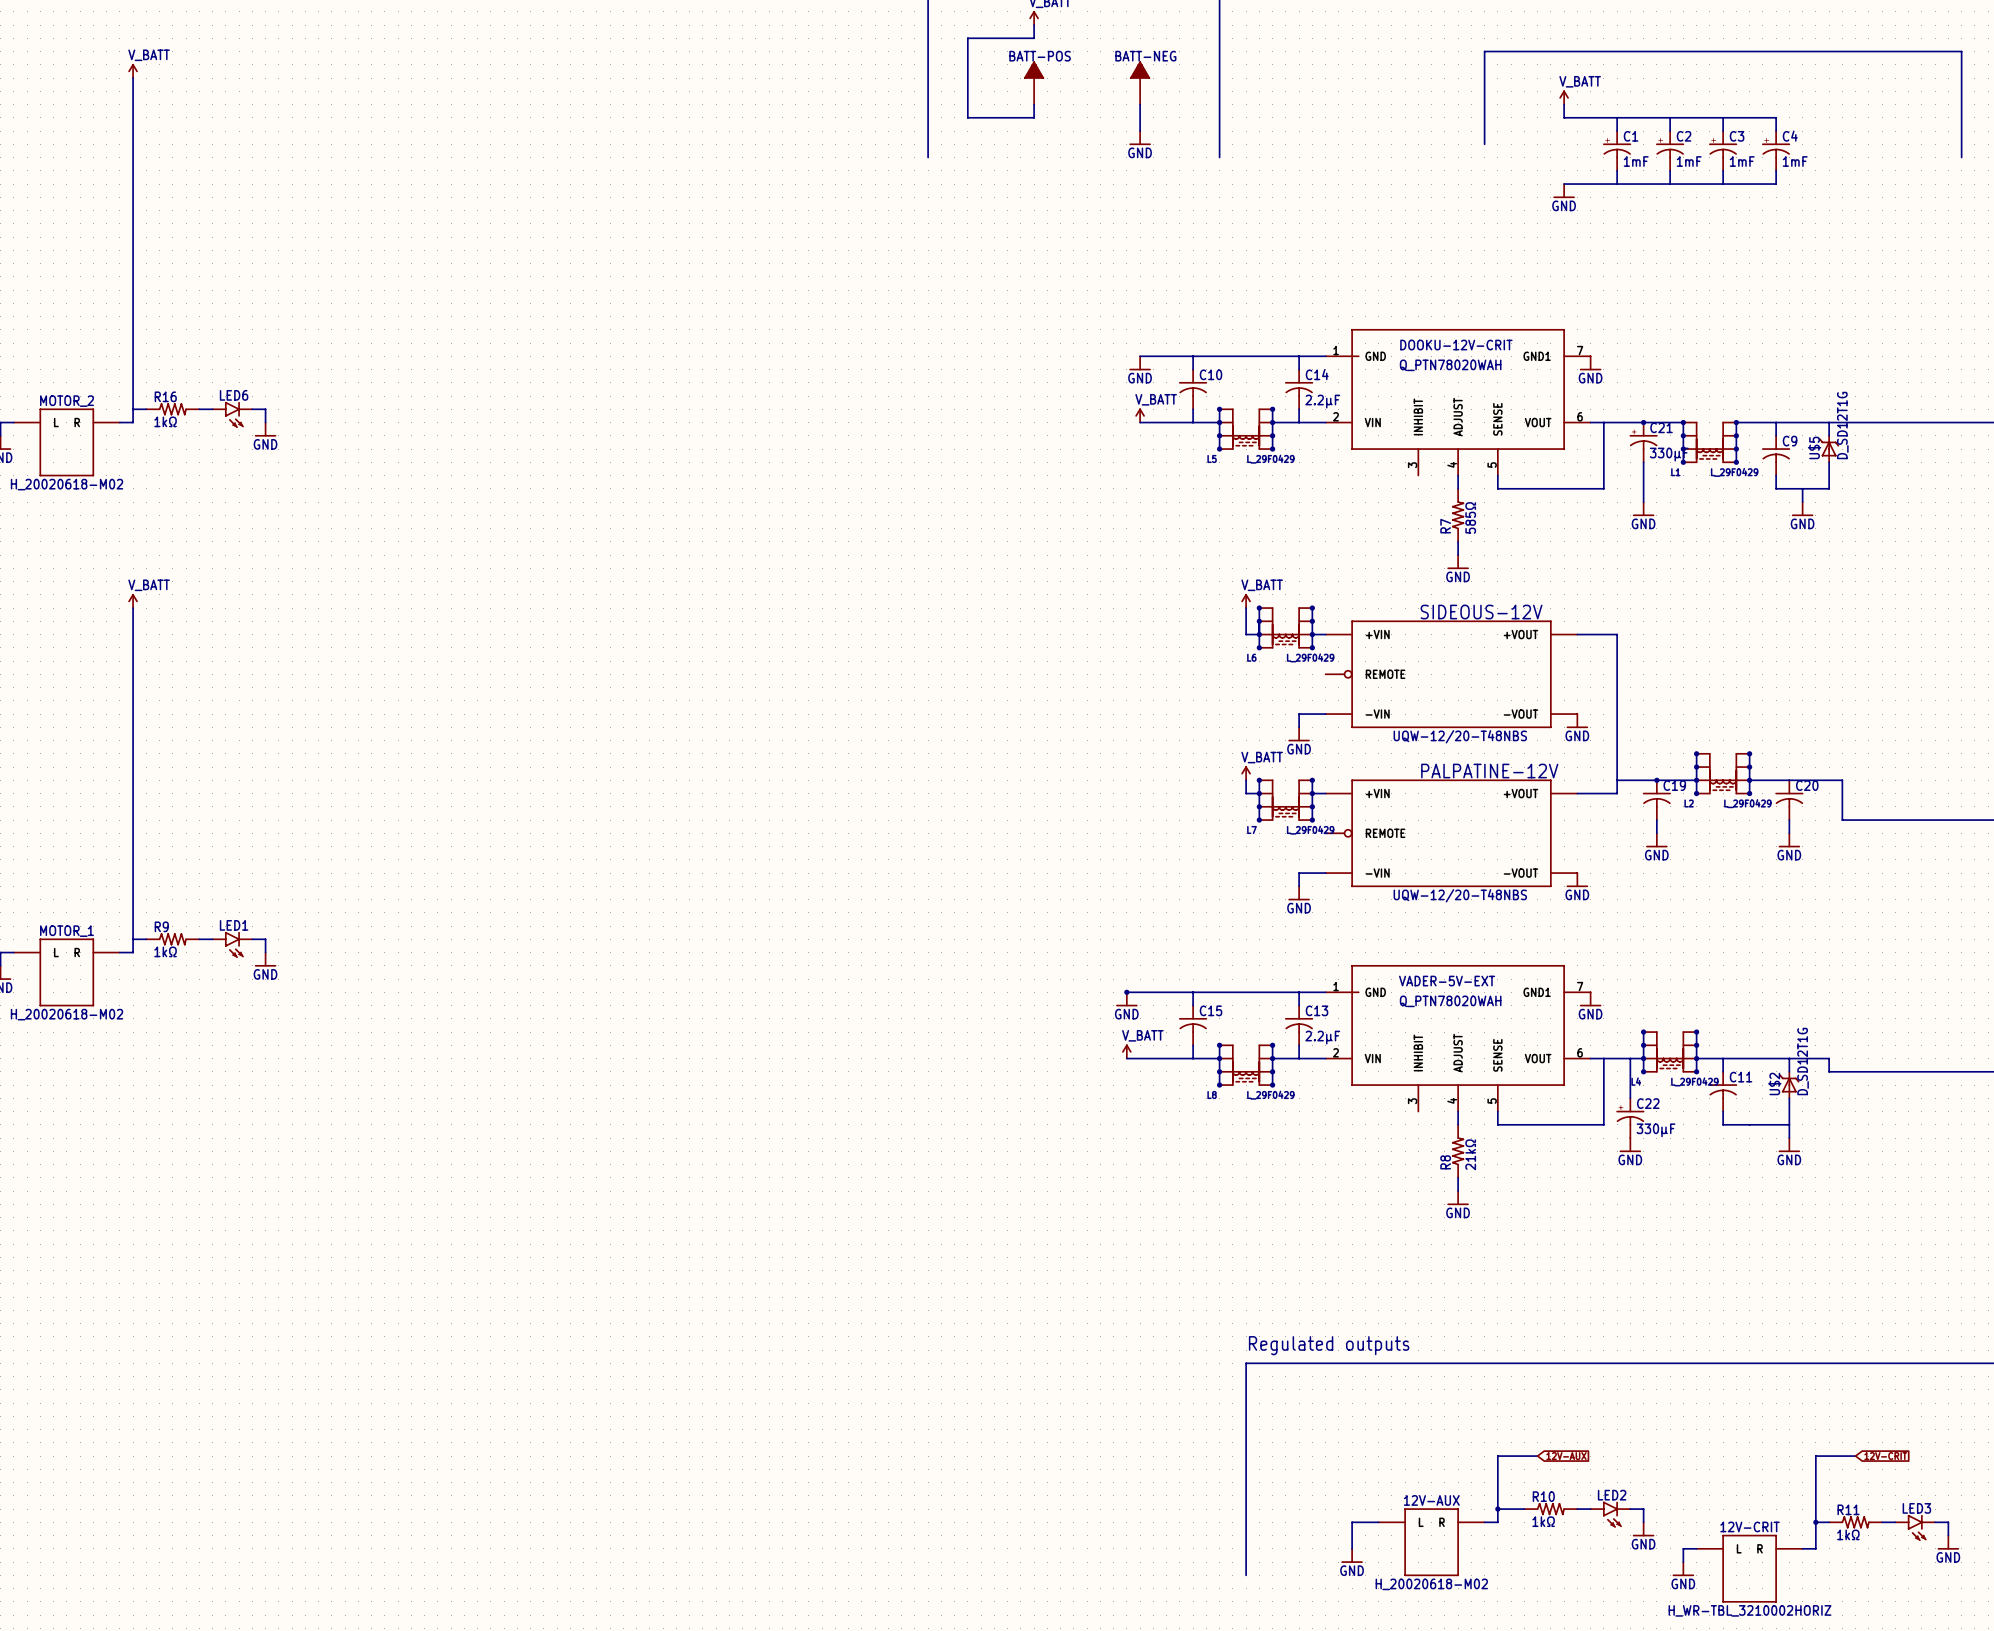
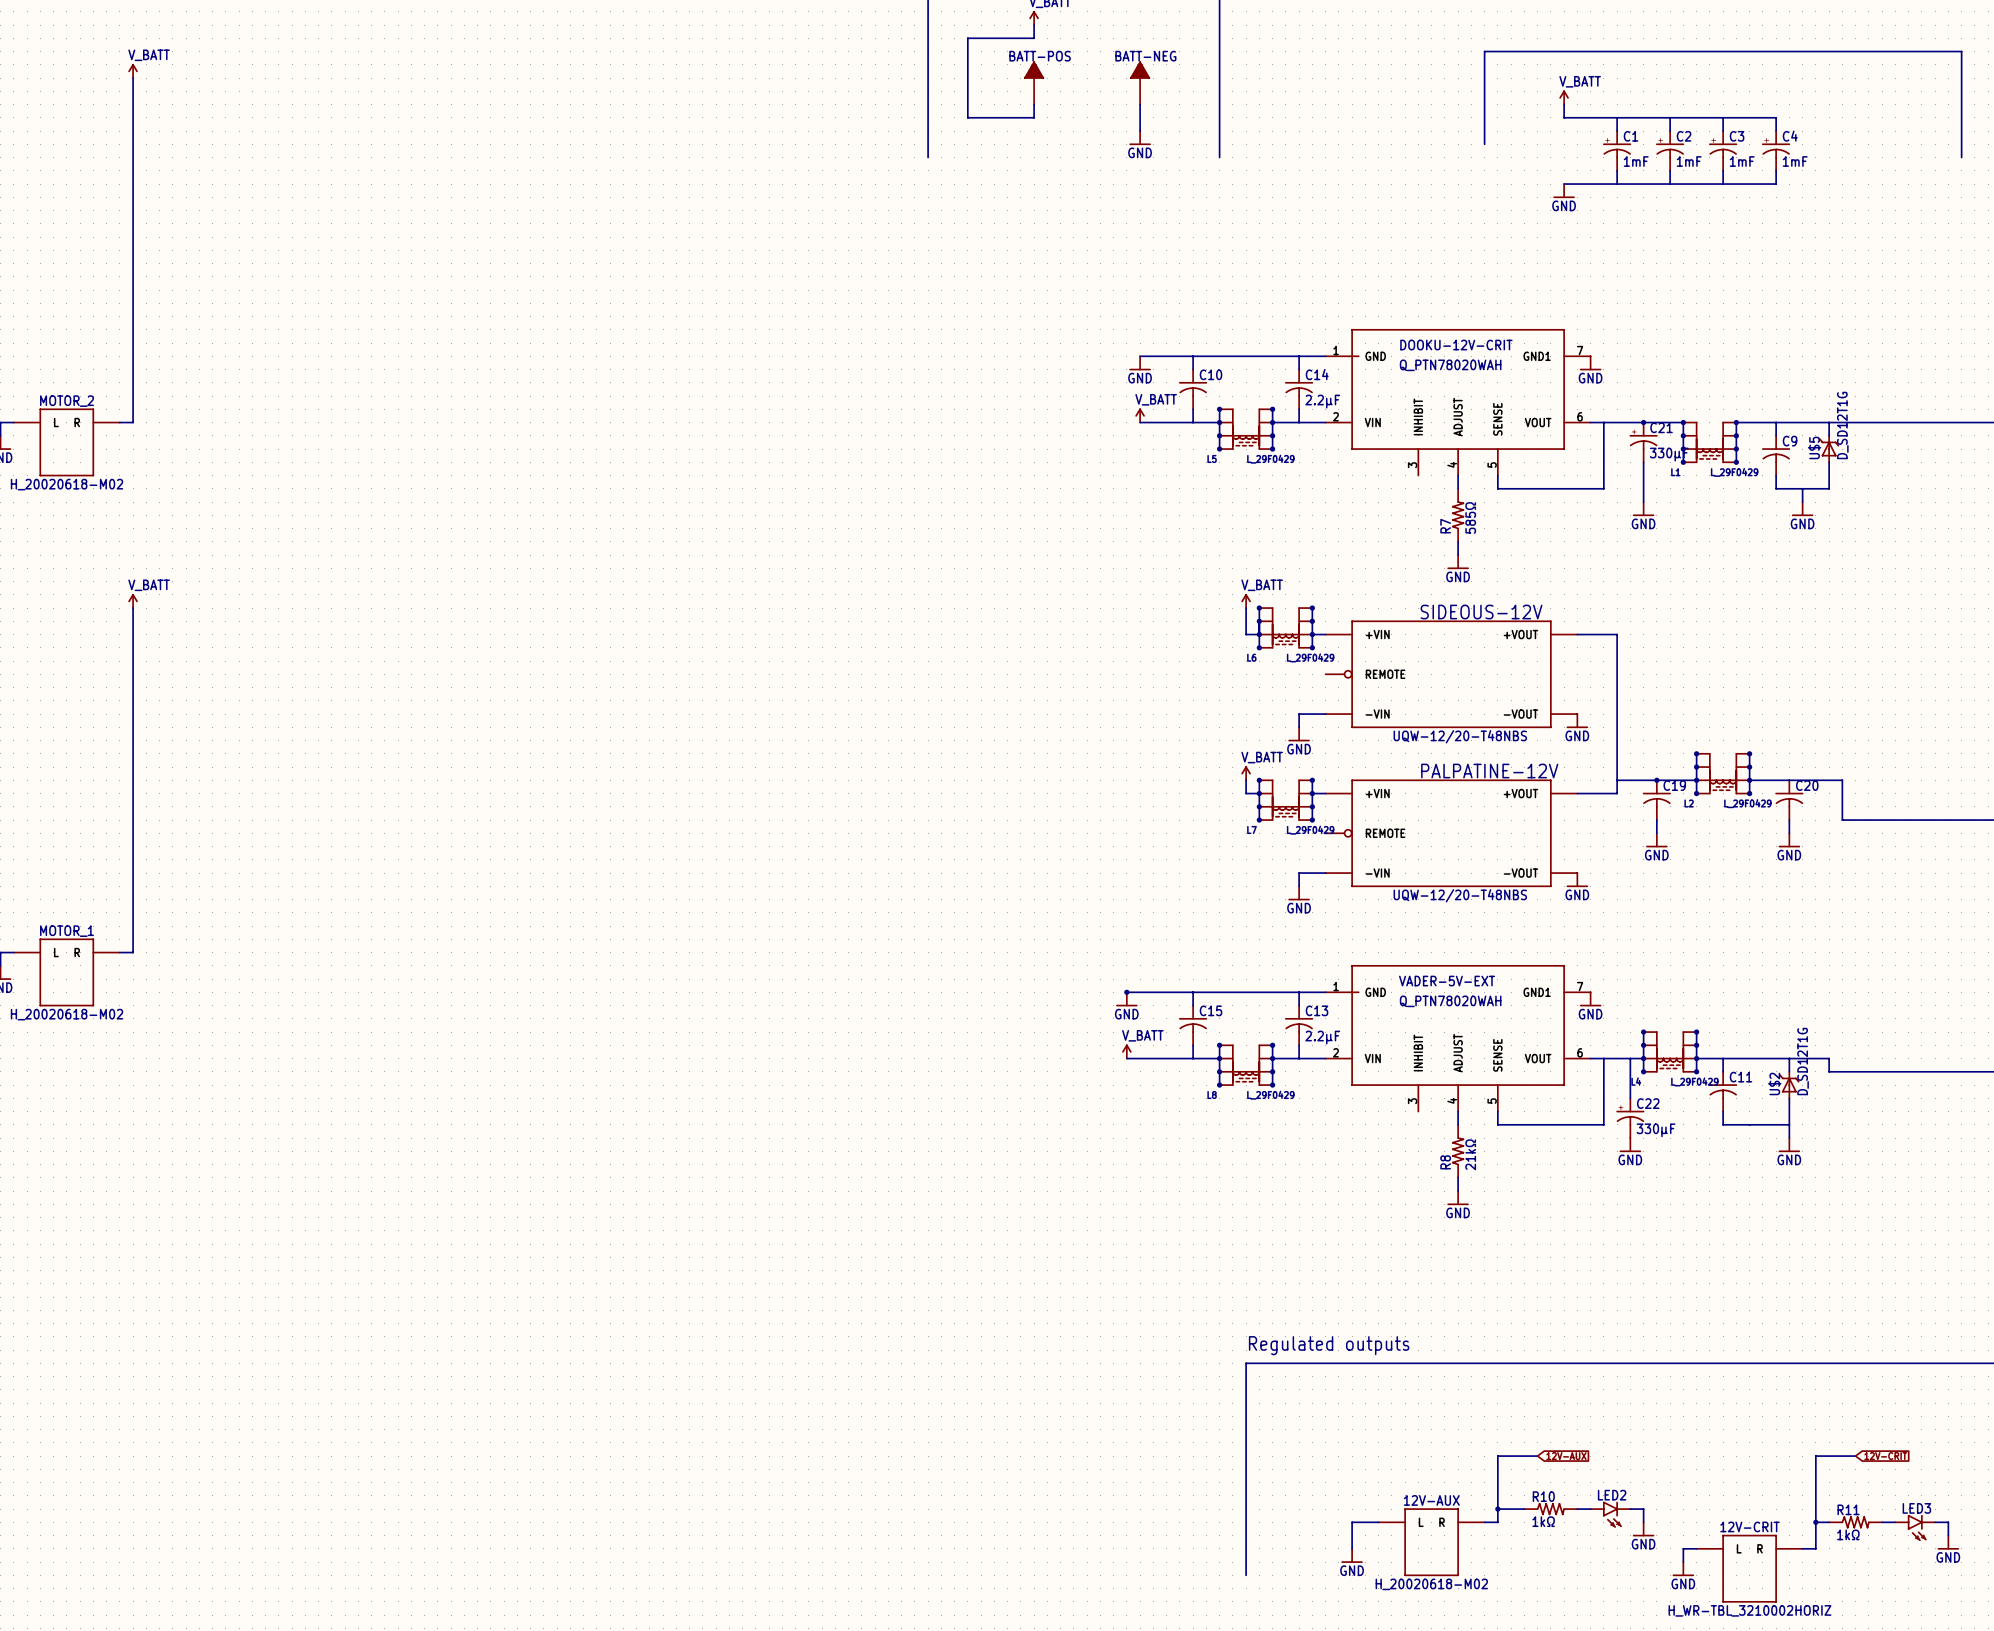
wire: (133, 409) (146, 409) -> none
R16: 1kΩ (172, 409) -> none
wire: (199, 409) (212, 409) -> none
wire: (252, 409) (265, 409) (265, 422) -> none
LED6: (232, 414) -> none
power symbol: GND (265, 429) -> none
wire: (133, 939) (146, 939) -> none
R9: 1kΩ (172, 939) -> none
wire: (199, 939) (212, 939) -> none
wire: (252, 939) (265, 939) (265, 952) -> none
LED1: (232, 944) -> none
power symbol: GND (265, 959) -> none

